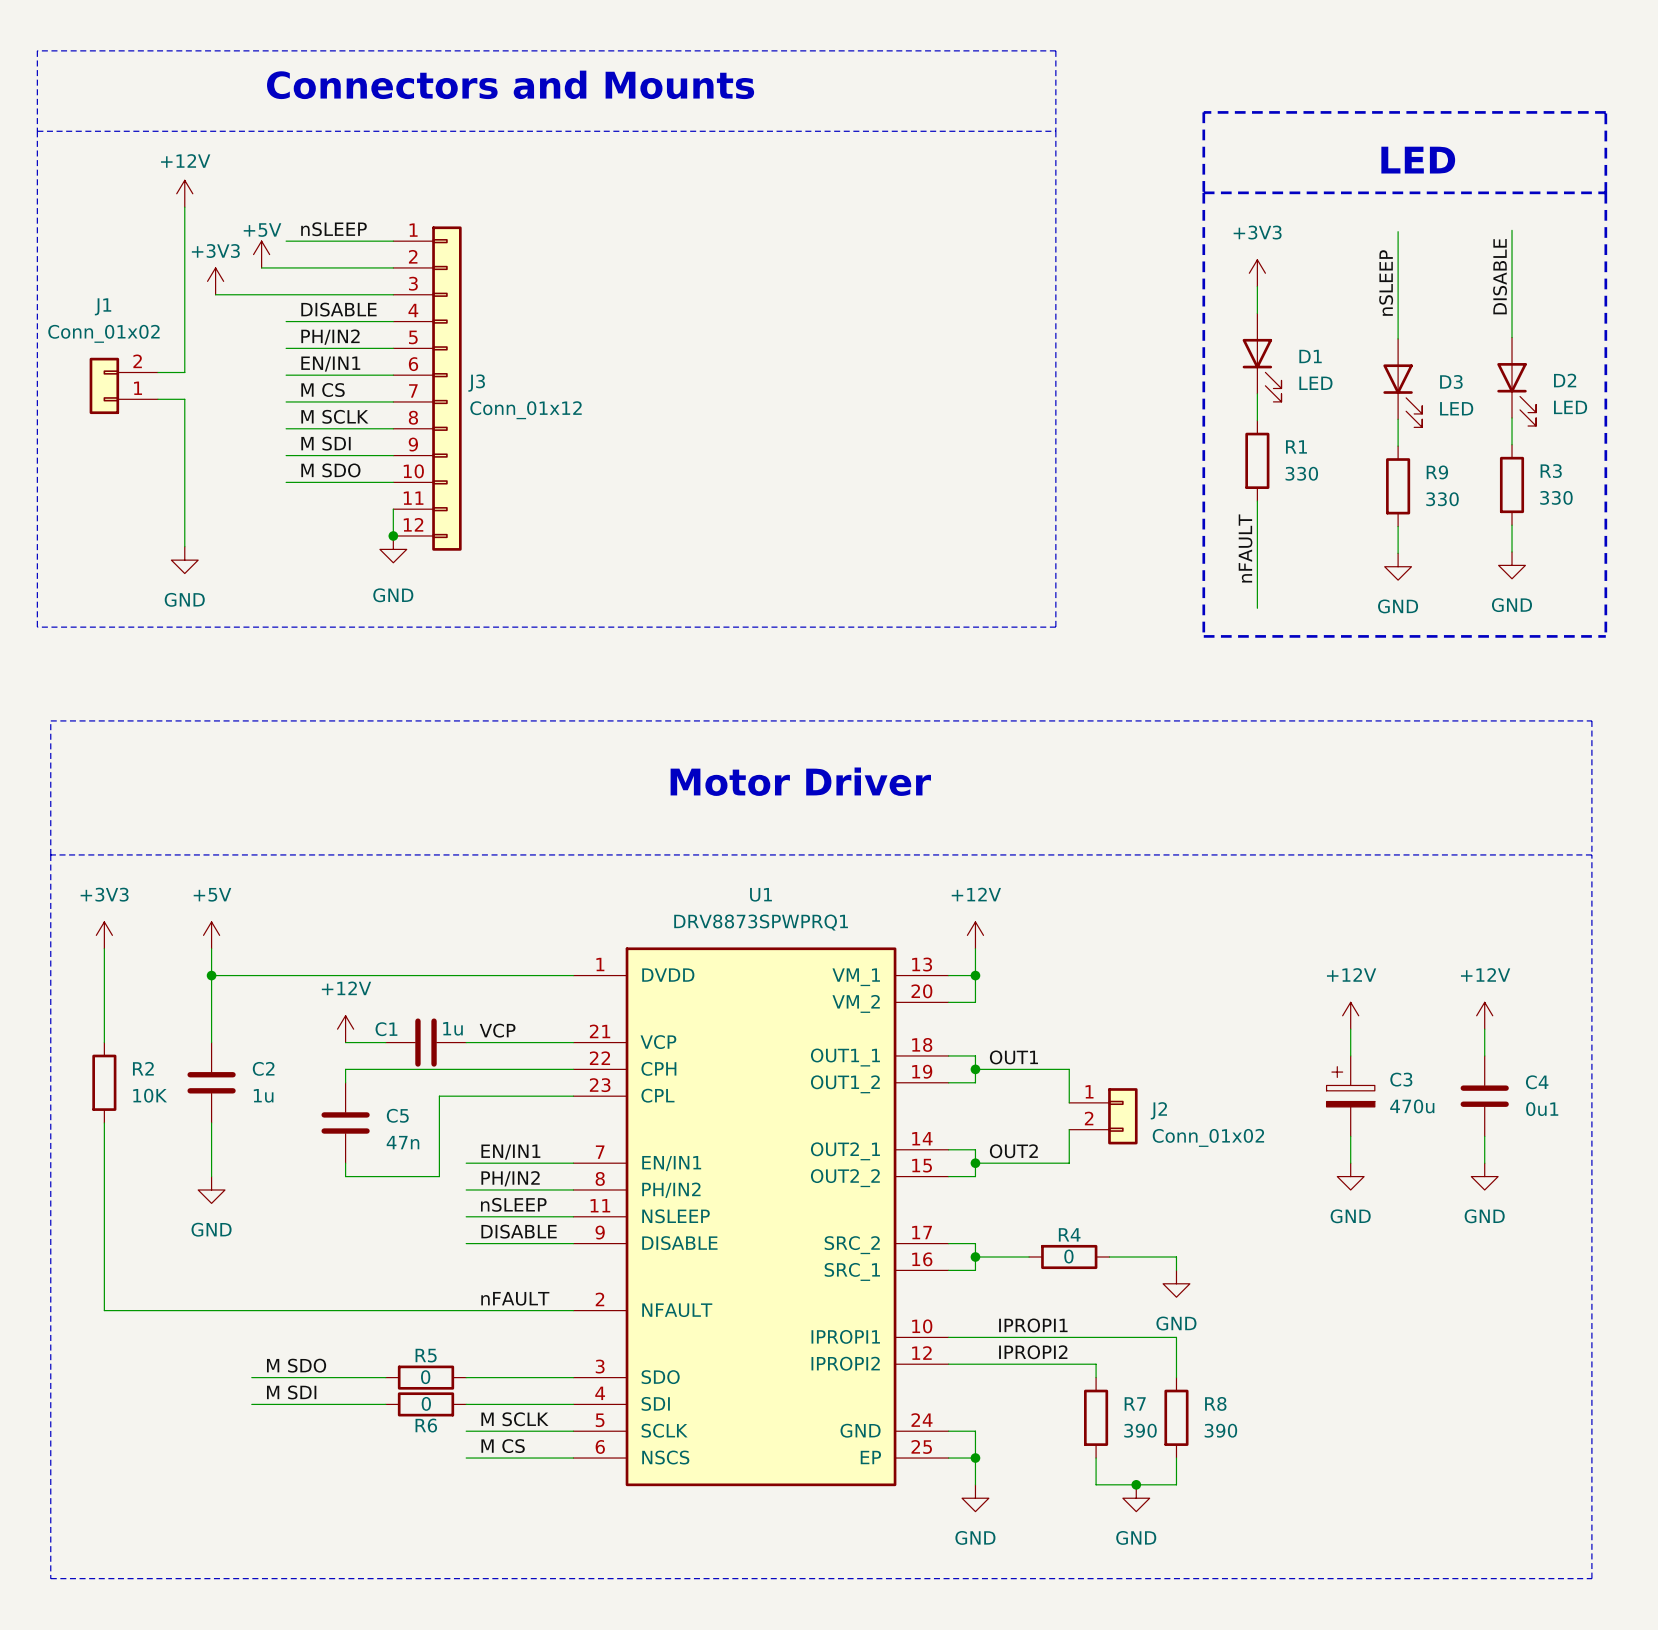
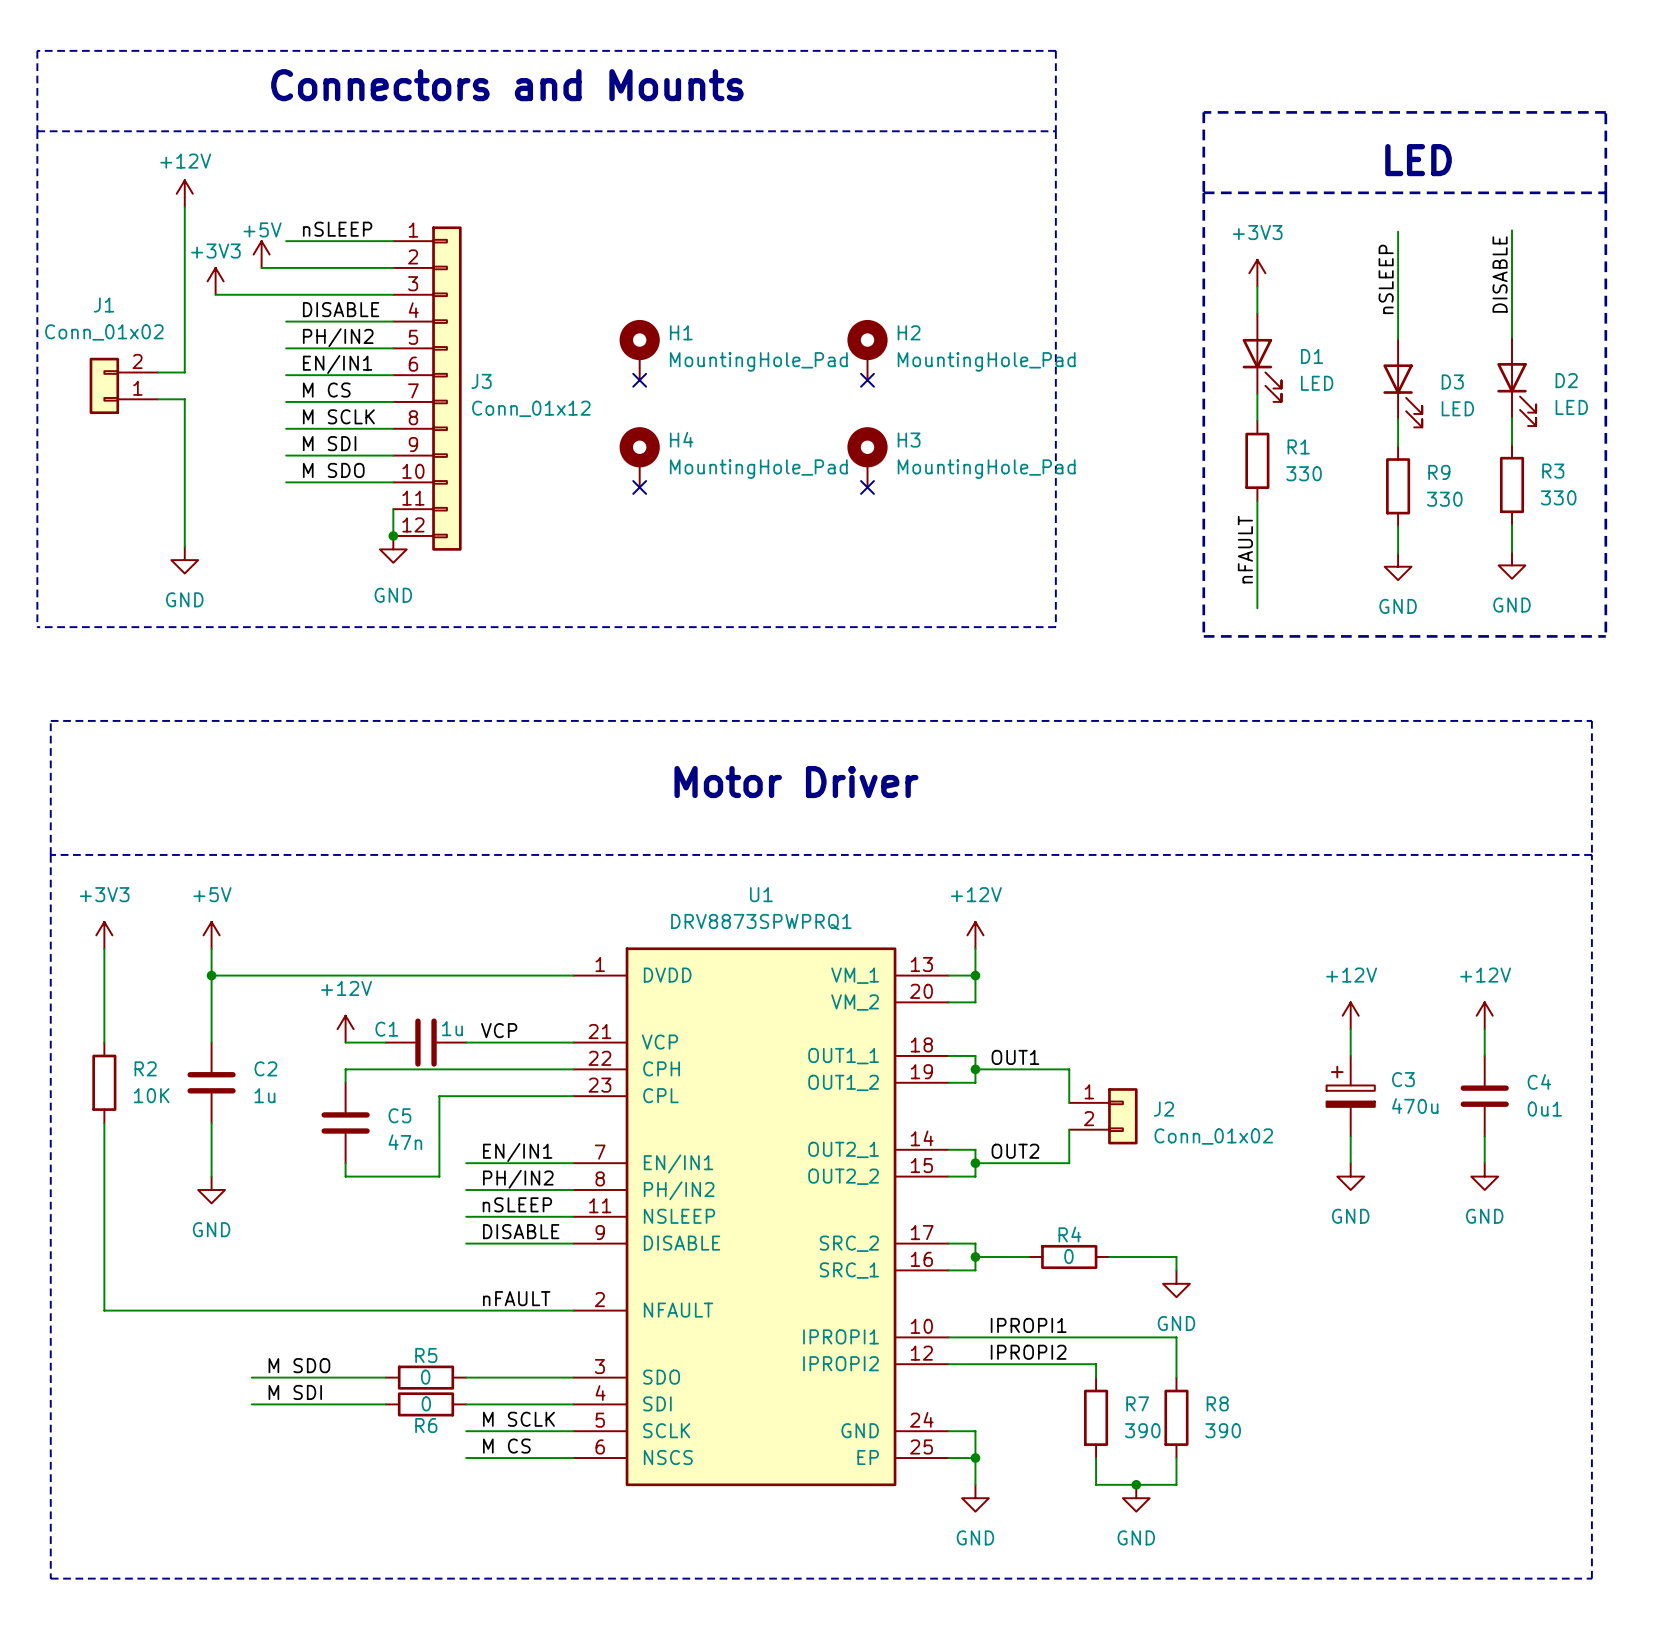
H1: none -> MountingHole_Pad (639, 350)
H2: none -> MountingHole_Pad (867, 350)
no-connect mark: none -> (639, 380)
no-connect mark: none -> (867, 380)
H4: none -> MountingHole_Pad (639, 457)
H3: none -> MountingHole_Pad (867, 457)
no-connect mark: none -> (639, 487)
no-connect mark: none -> (867, 487)

